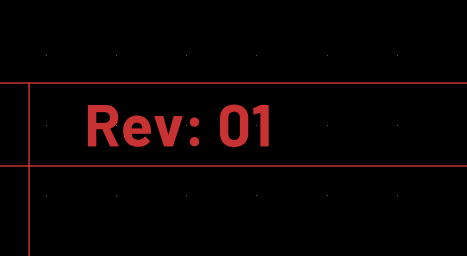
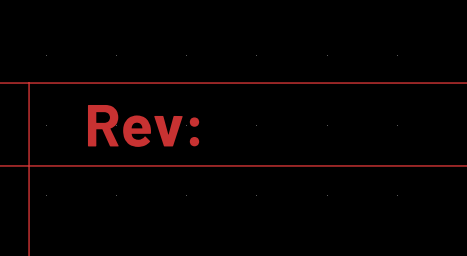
title block: Rev: 01 (178, 125) -> Rev: (143, 125)

